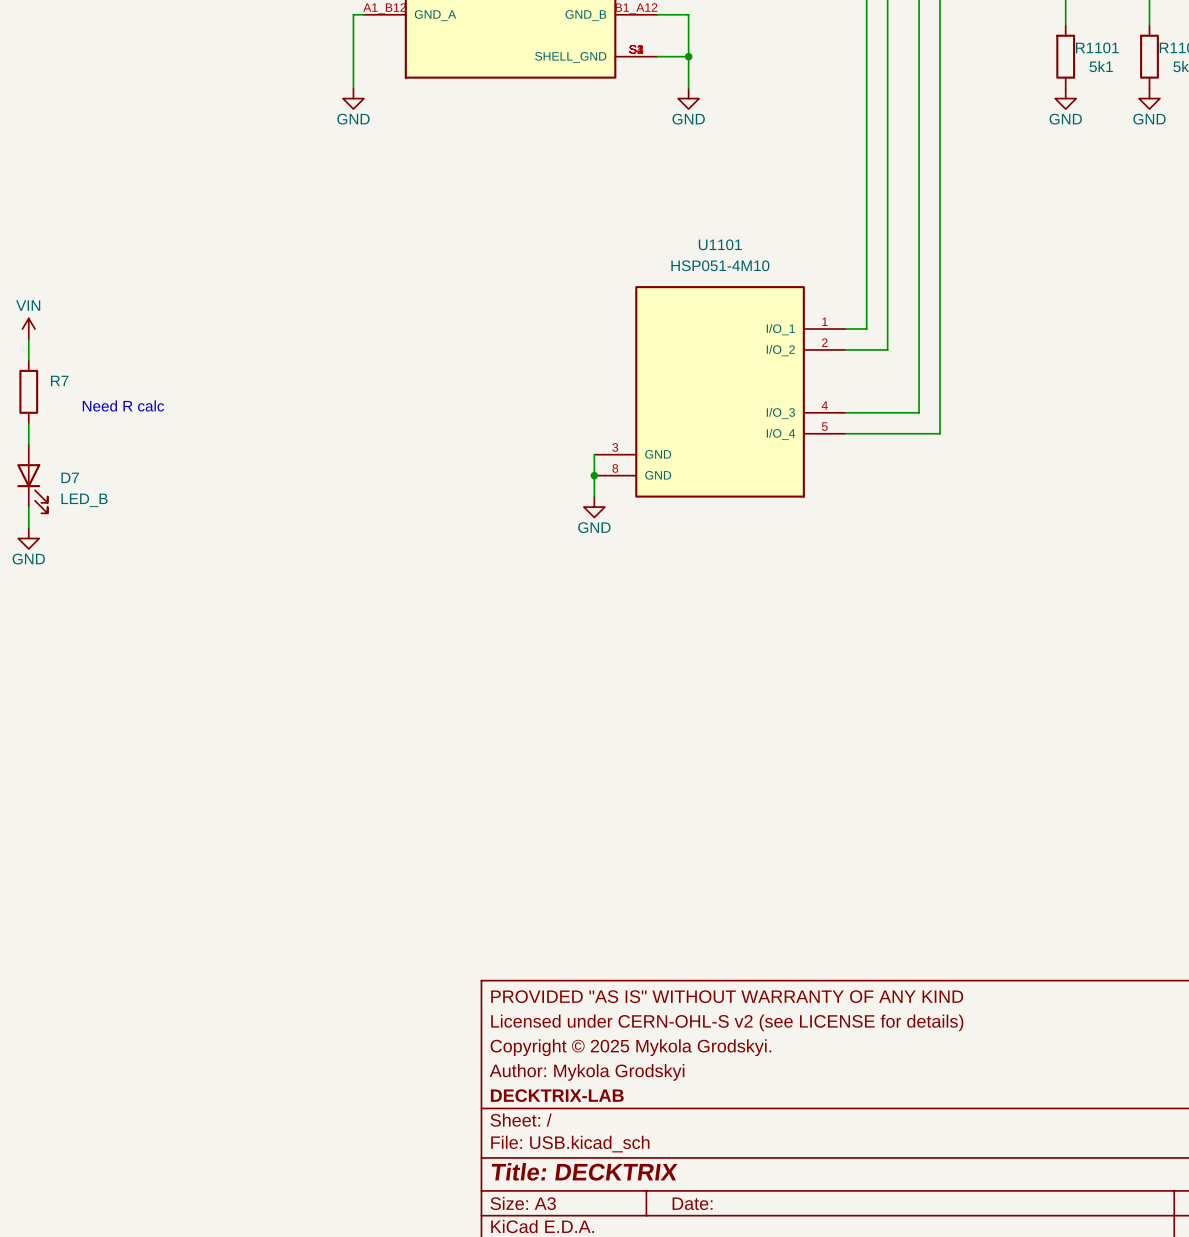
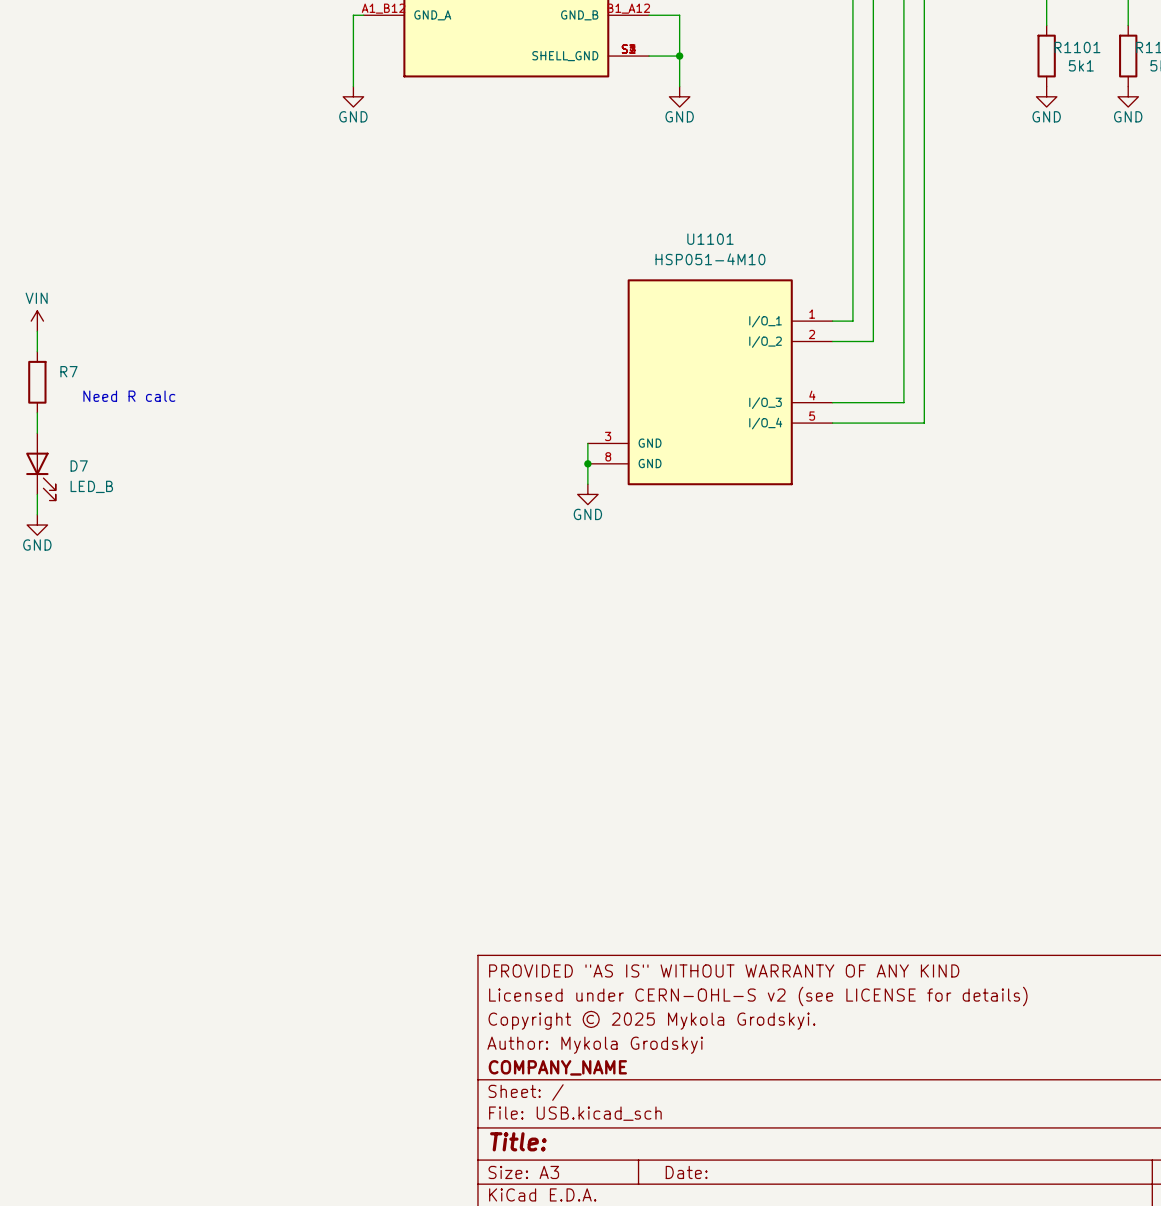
title block: DECKTRIX-LAB (557, 1095) -> COMPANY_NAME (557, 1067)
title block: Title: DECKTRIX (584, 1171) -> Title: (518, 1141)

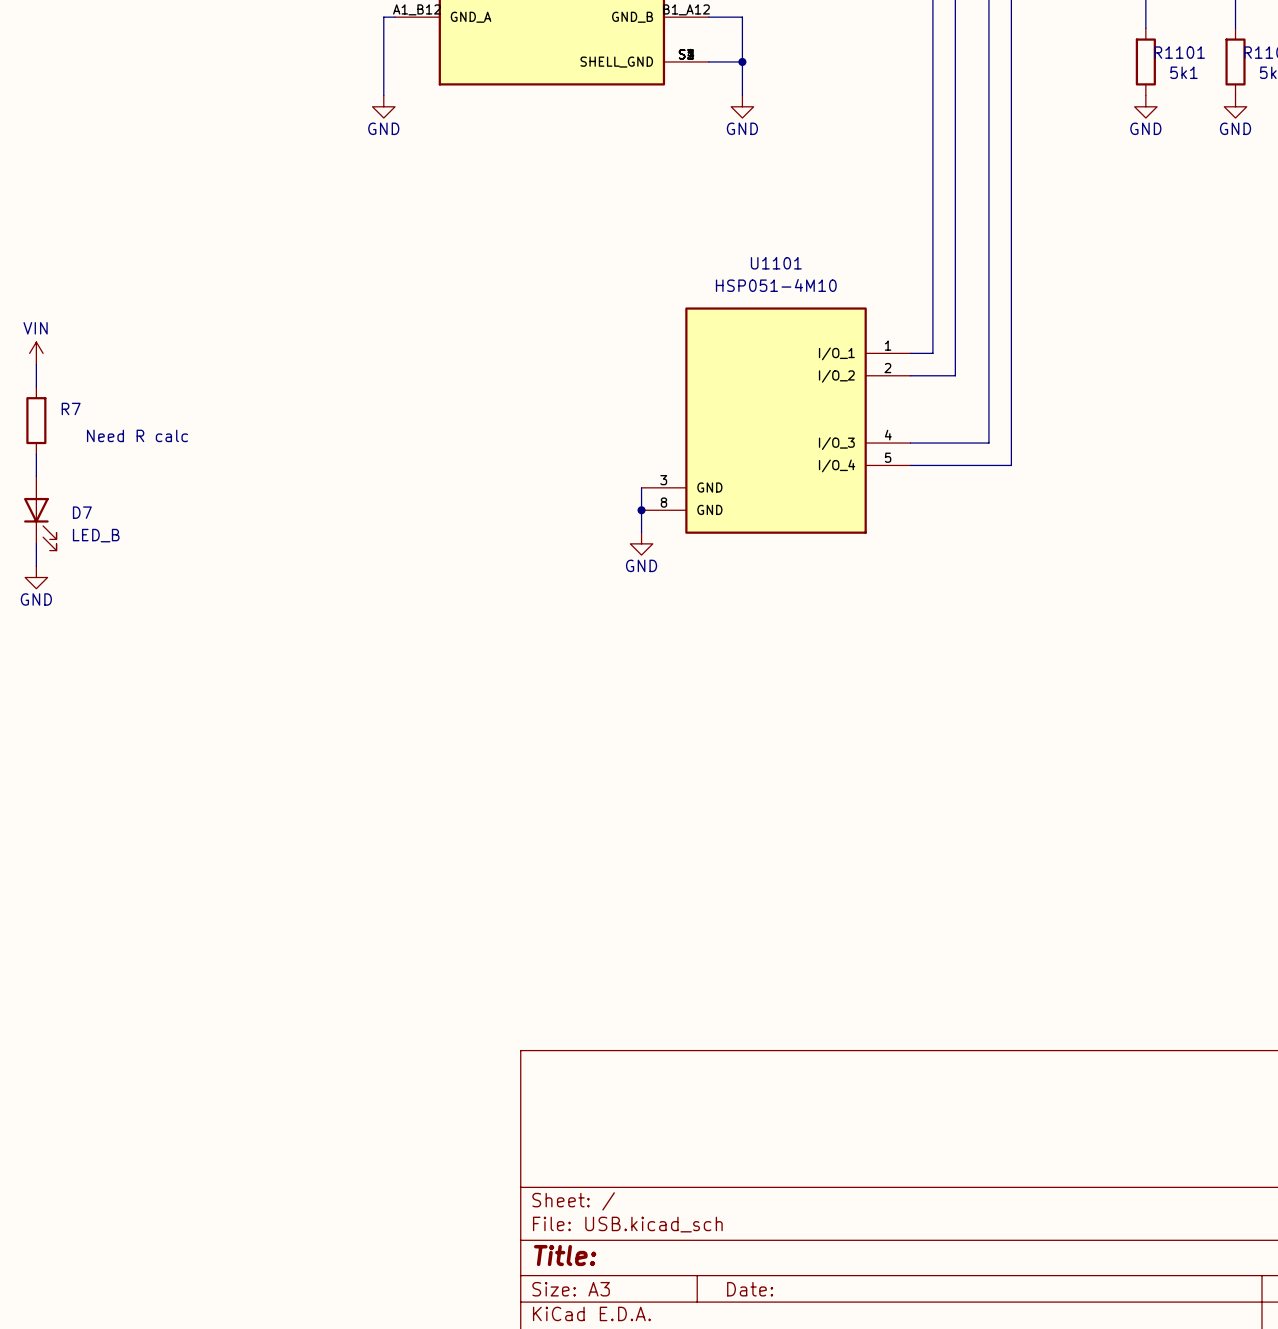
title block: PROVIDED "AS IS" WITHOUT WARRANTY OF ANY KIND (724, 970) -> none
title block: Licensed under CERN-OHL-S v2 (see LICENSE for details) (758, 996) -> none
title block: Copyright © 2025 Mykola Grodskyi. (651, 1020) -> none
title block: Author: Mykola Grodskyi (595, 1045) -> none
title block: COMPANY_NAME (557, 1067) -> none

